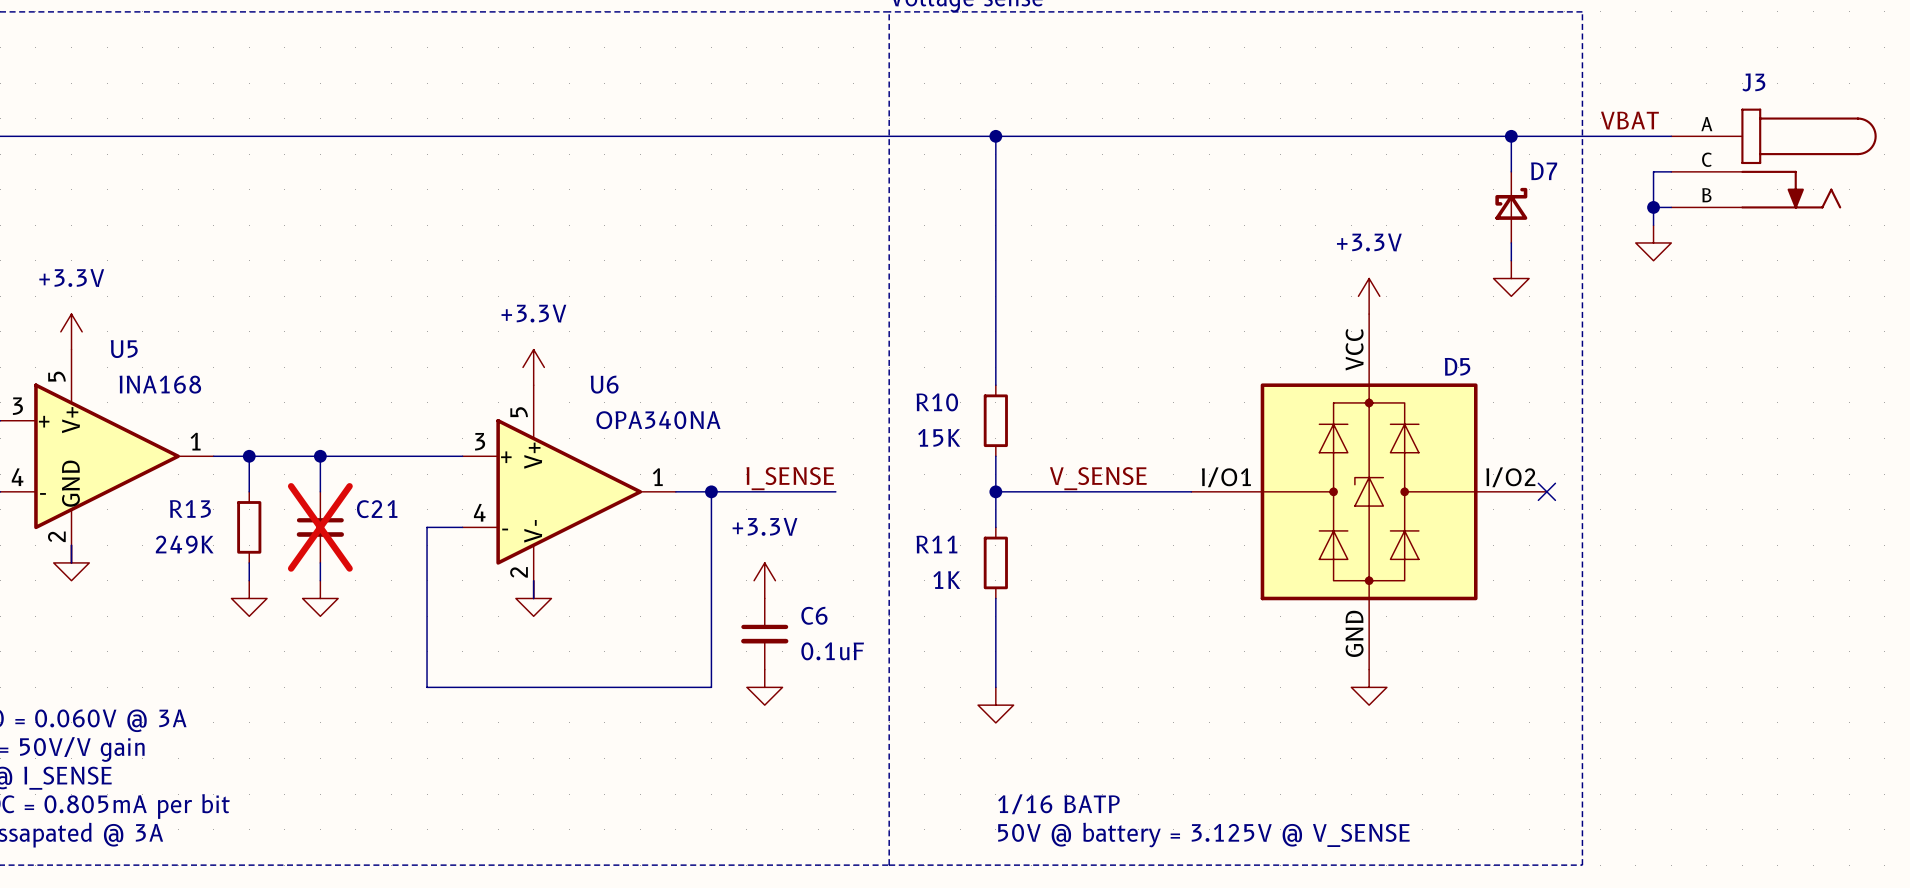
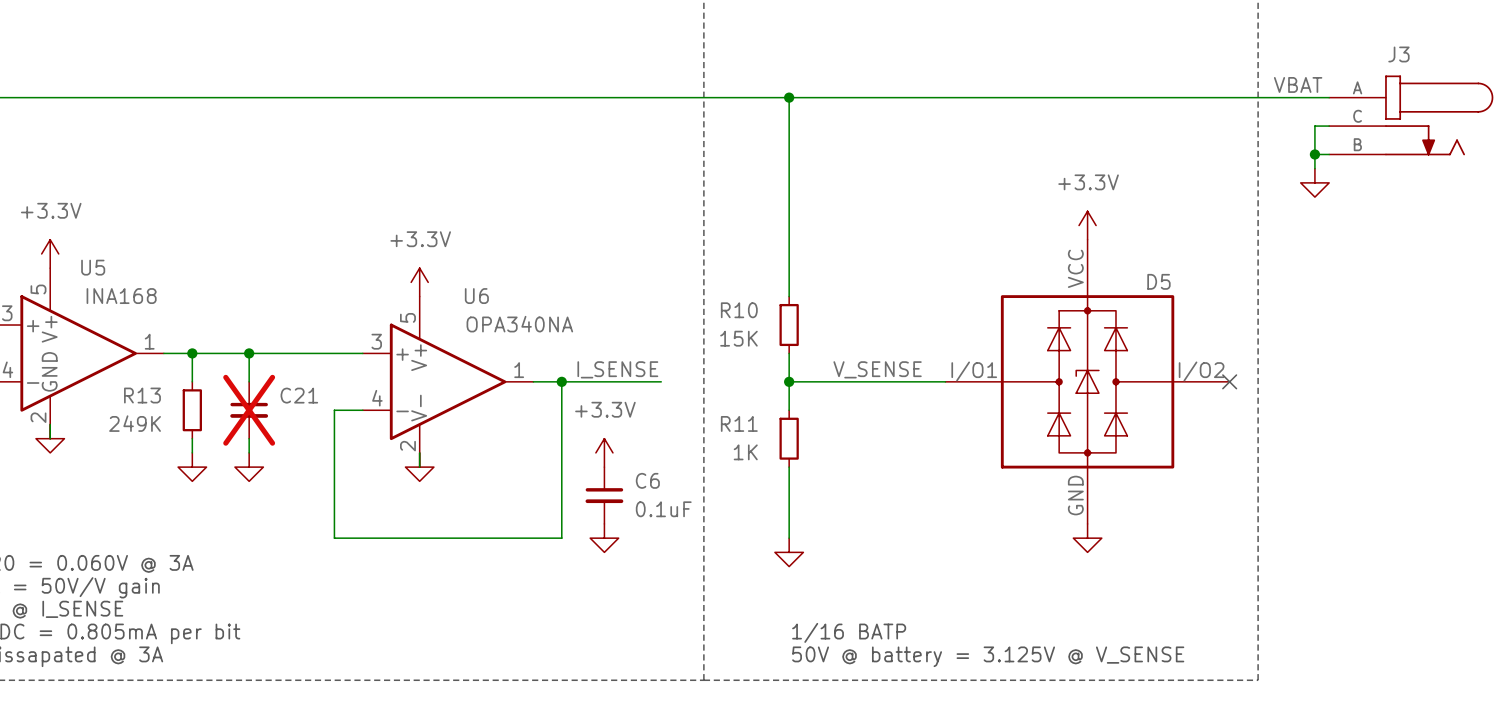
wire: (1511, 136) (1511, 171) -> none
junction: (1511, 136) -> none
D7: (1511, 207) -> none
wire: (1511, 242) (1511, 260) -> none
power symbol: (1511, 278) -> none

